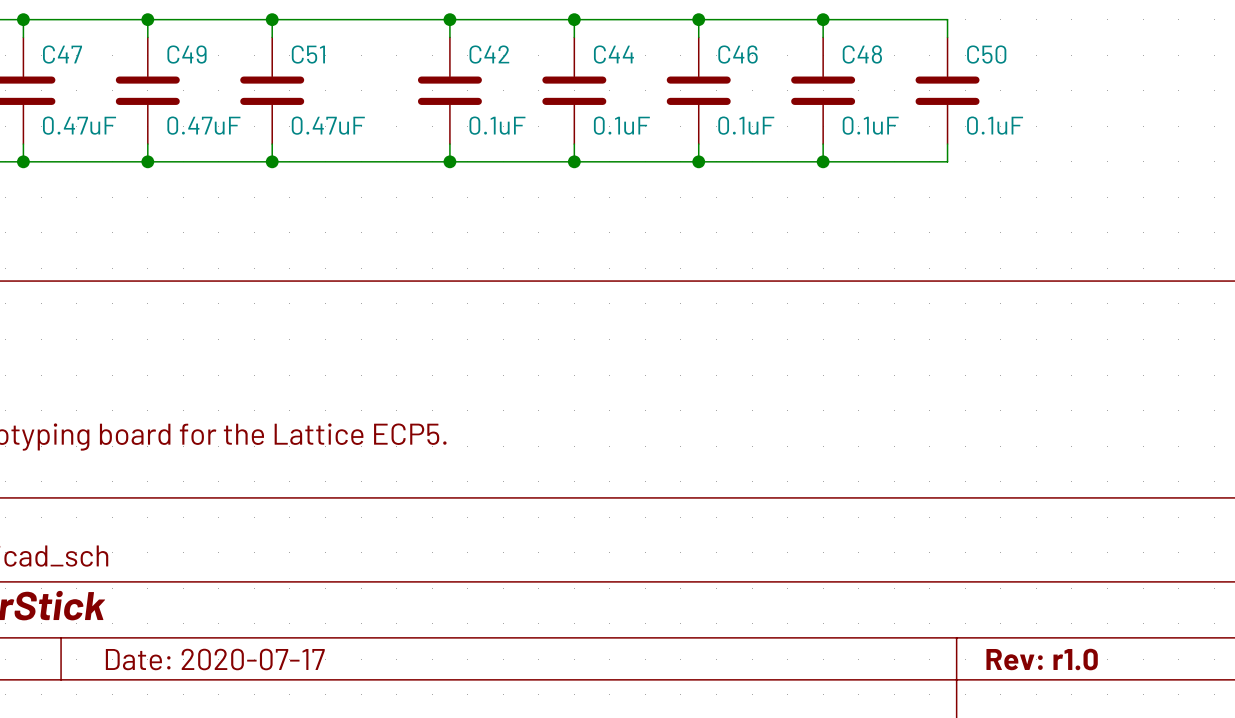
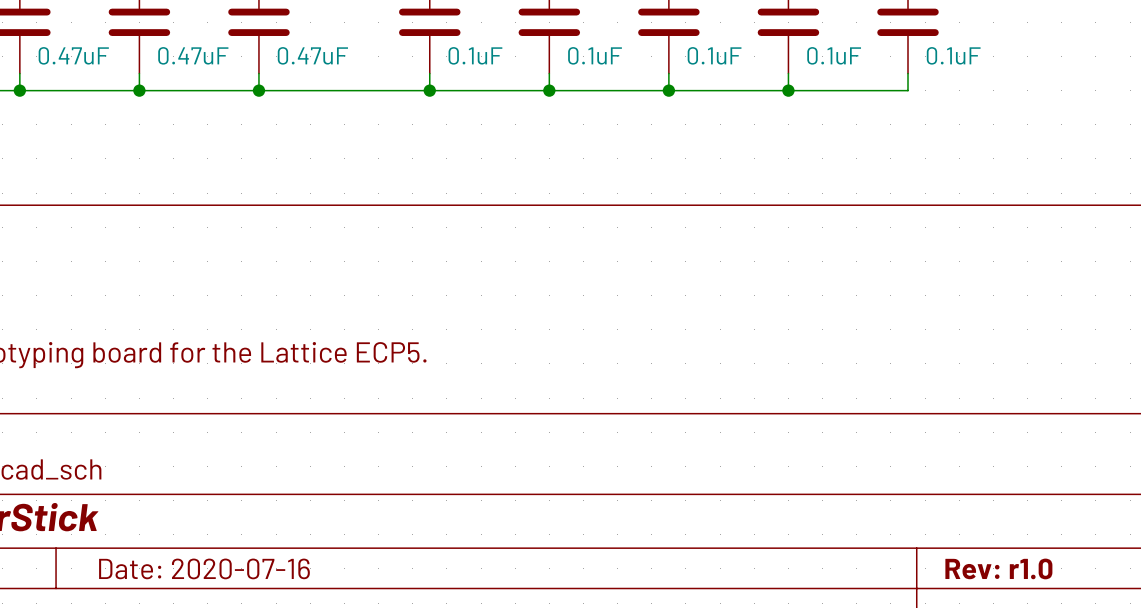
title block: Date: 2020-07-17 (215, 659) -> Date: 2020-07-16 (204, 568)

